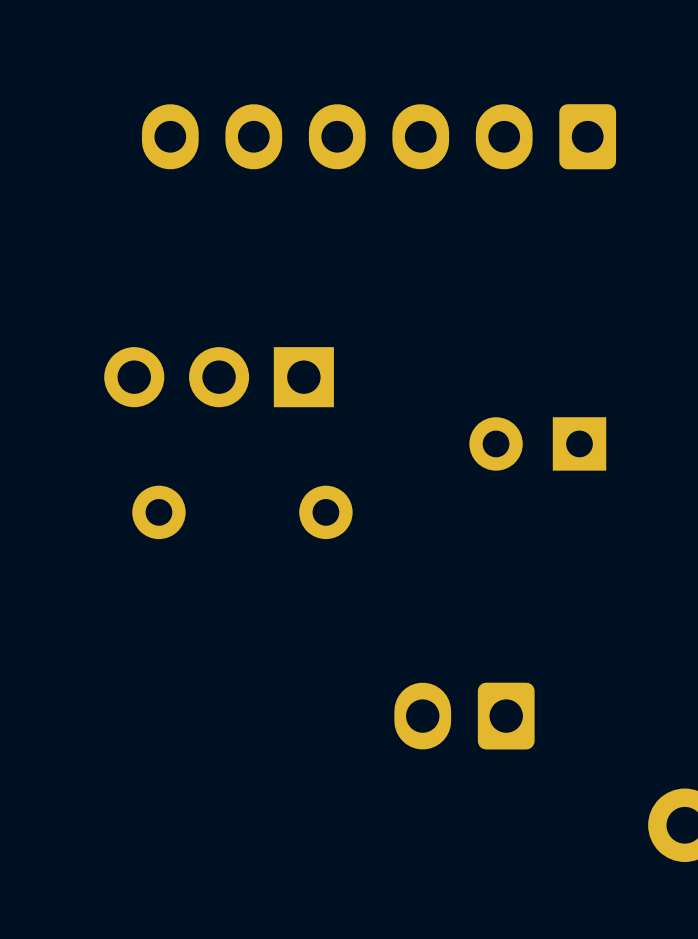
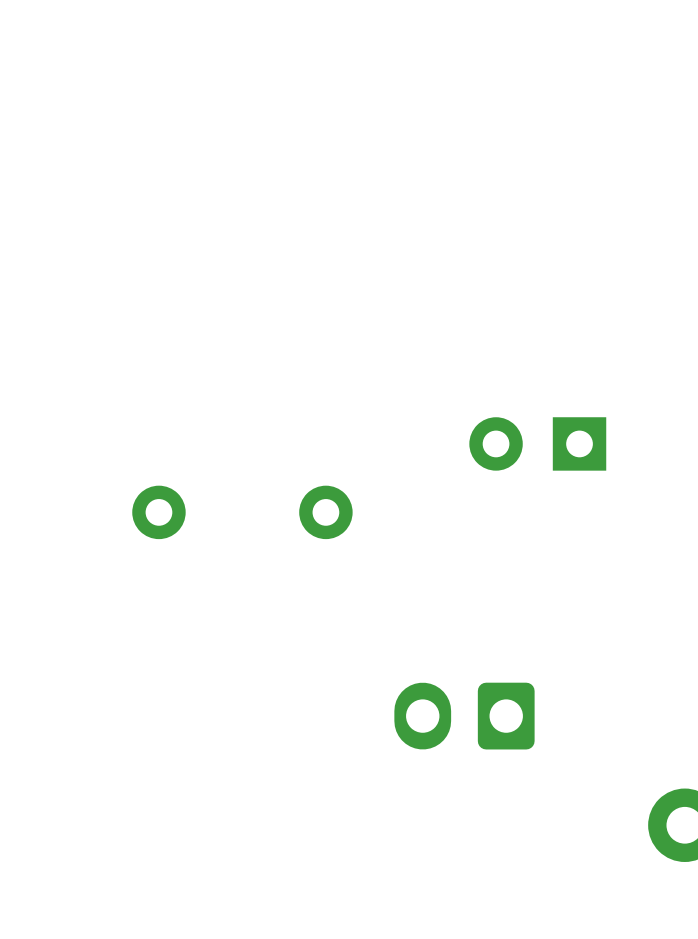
part: (379, 136) -> none
part: (219, 377) -> none

